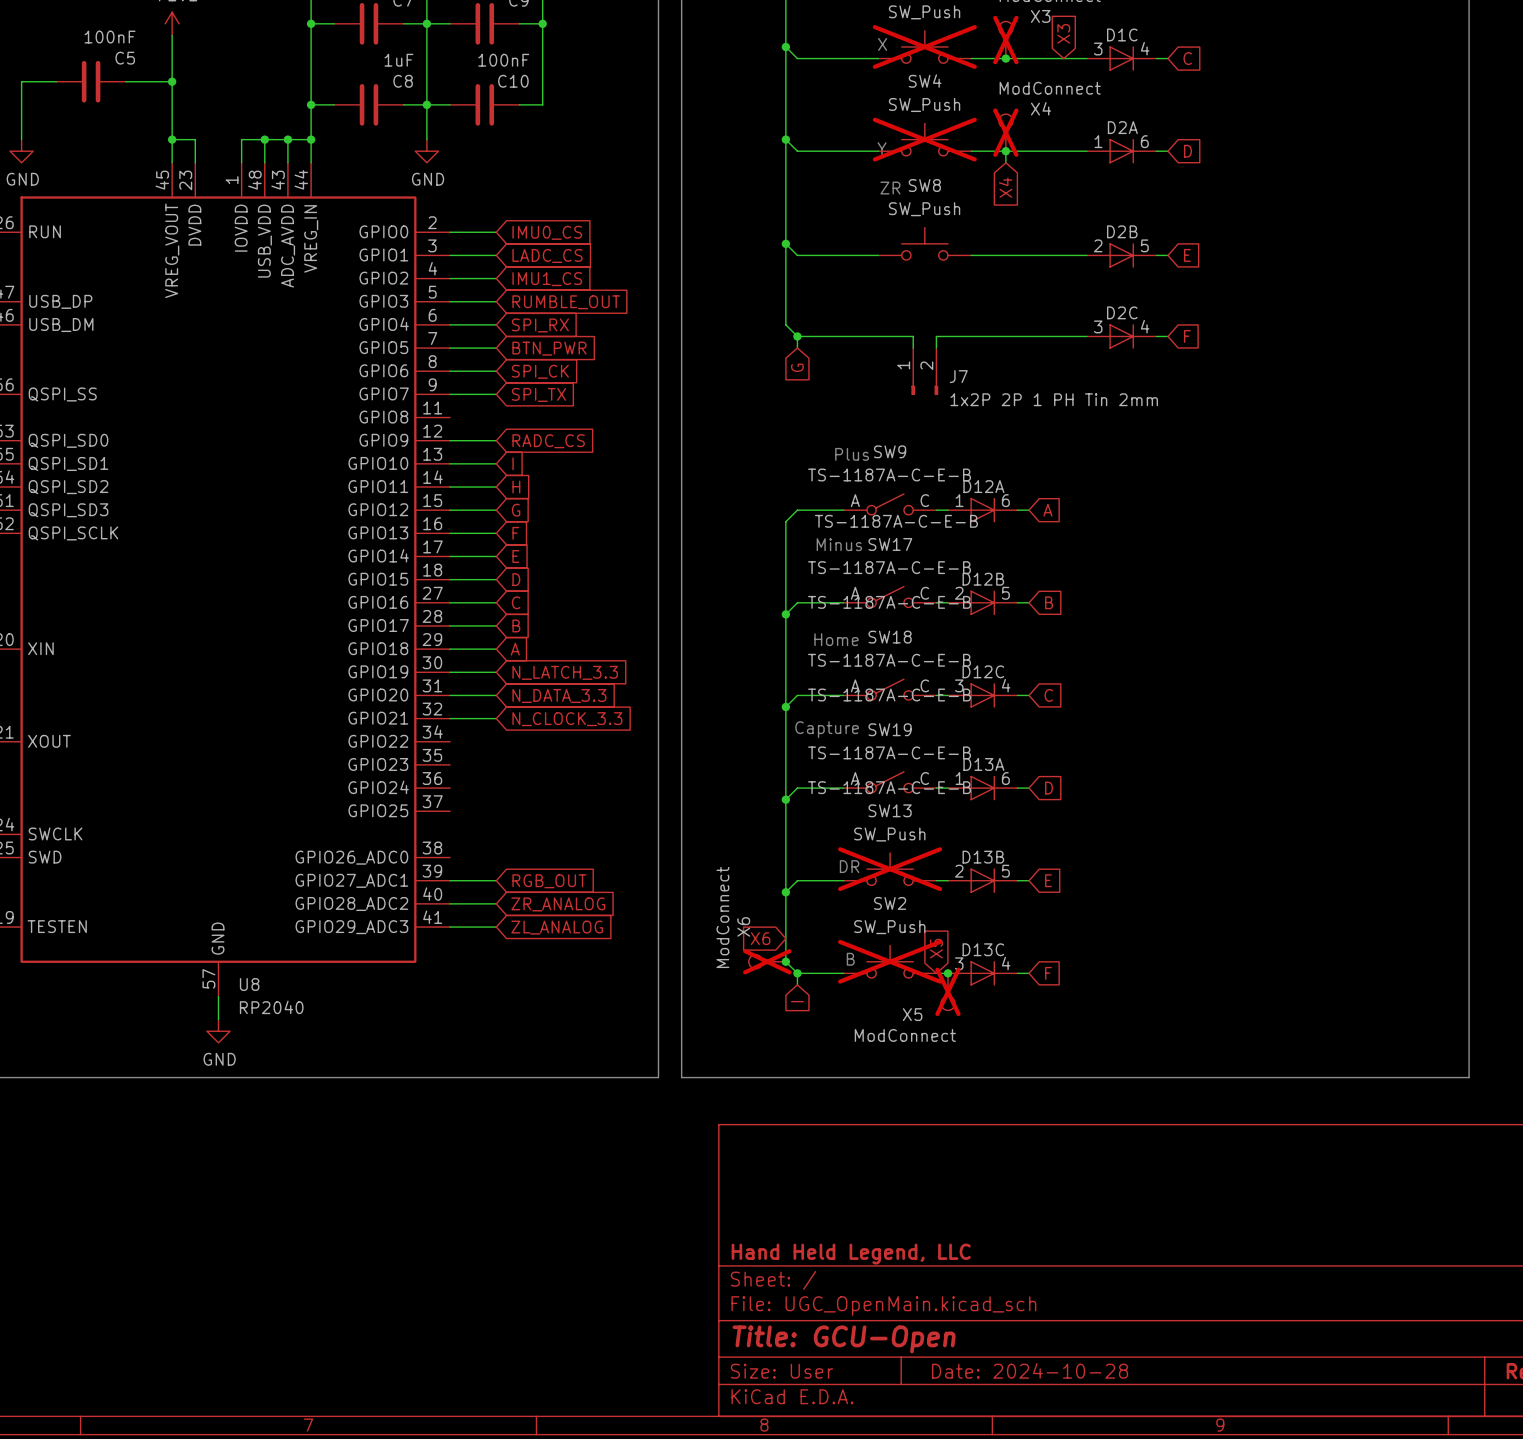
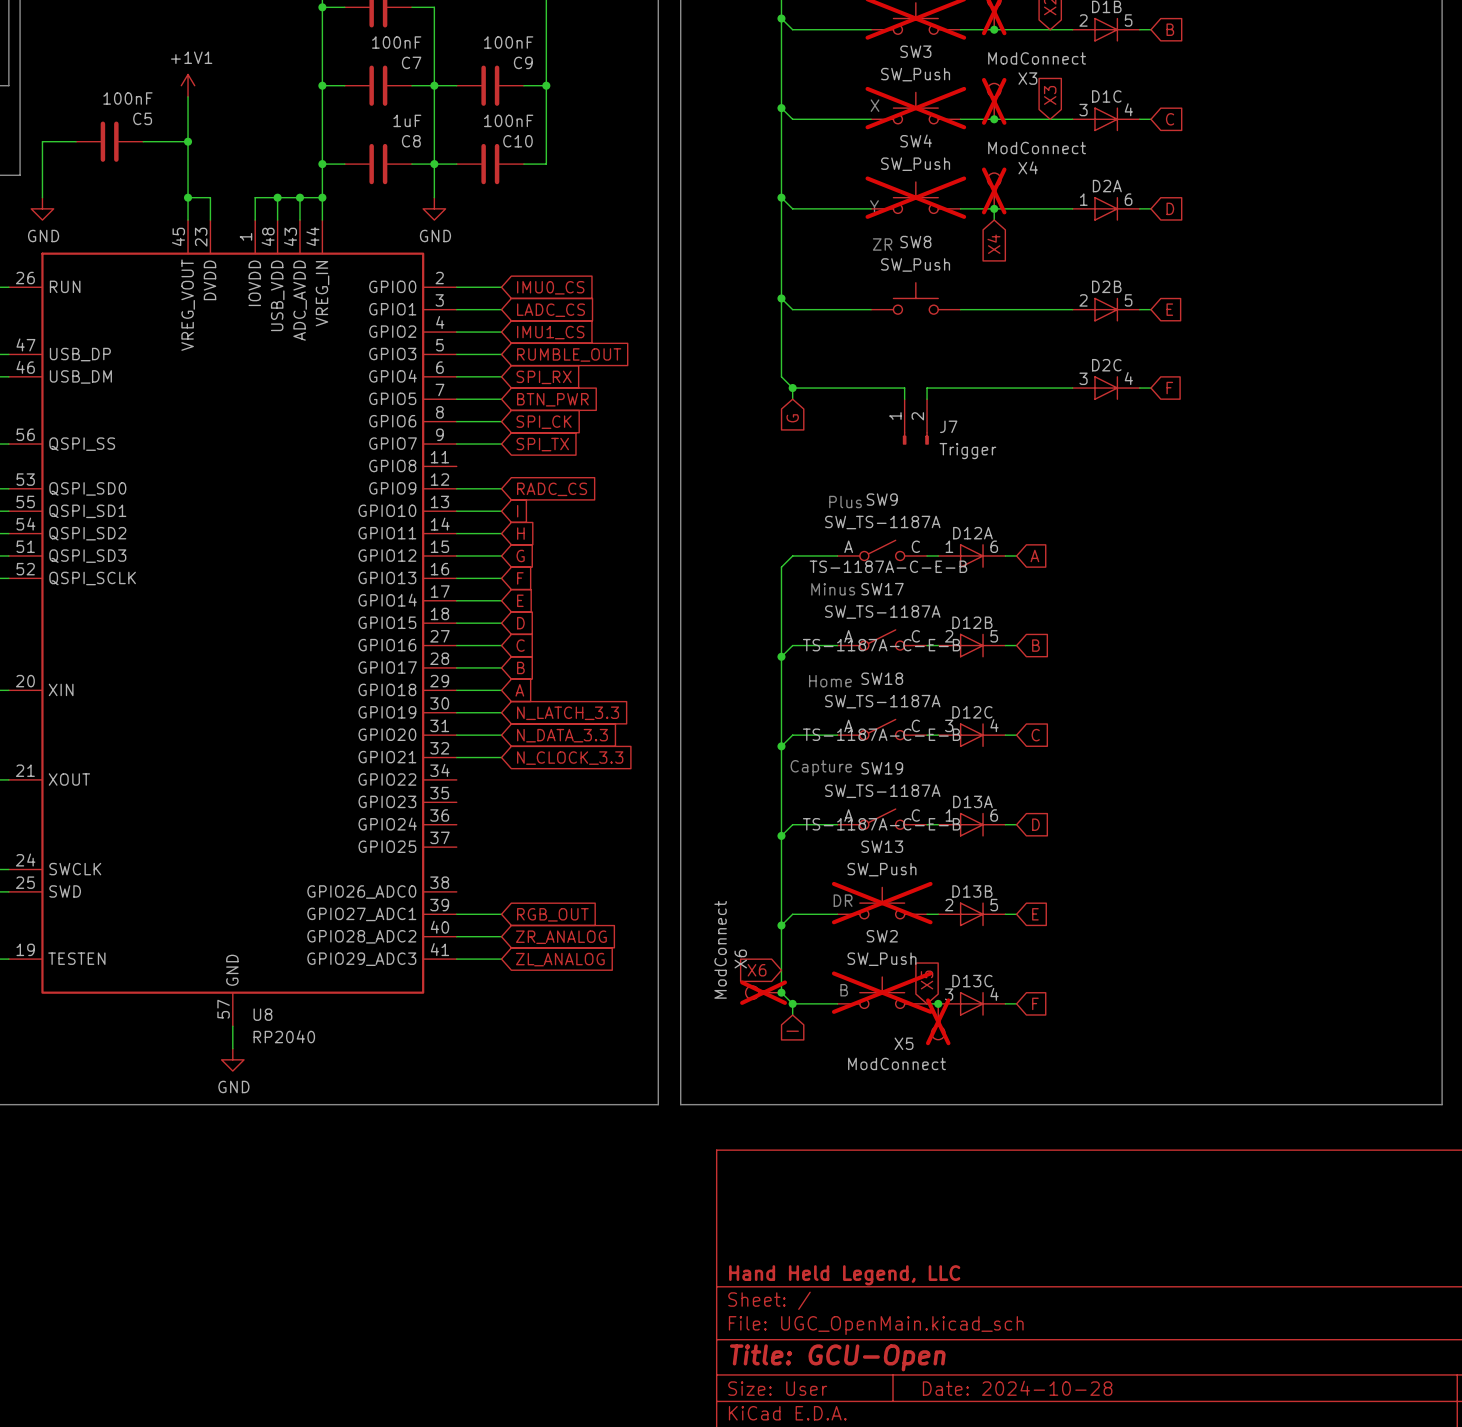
J7 value: 1x2P 2P 1 PH Tin 2mm (1054, 399) -> Trigger (967, 451)
SW9 value: TS-1187A-C-E-B (889, 475) -> SW_TS-1187A (882, 522)
SW17 value: TS-1187A-C-E-B (889, 567) -> SW_TS-1187A (882, 612)
SW18 value: TS-1187A-C-E-B (889, 660) -> SW_TS-1187A (882, 701)
SW19 value: TS-1187A-C-E-B (889, 752) -> SW_TS-1187A (882, 791)

